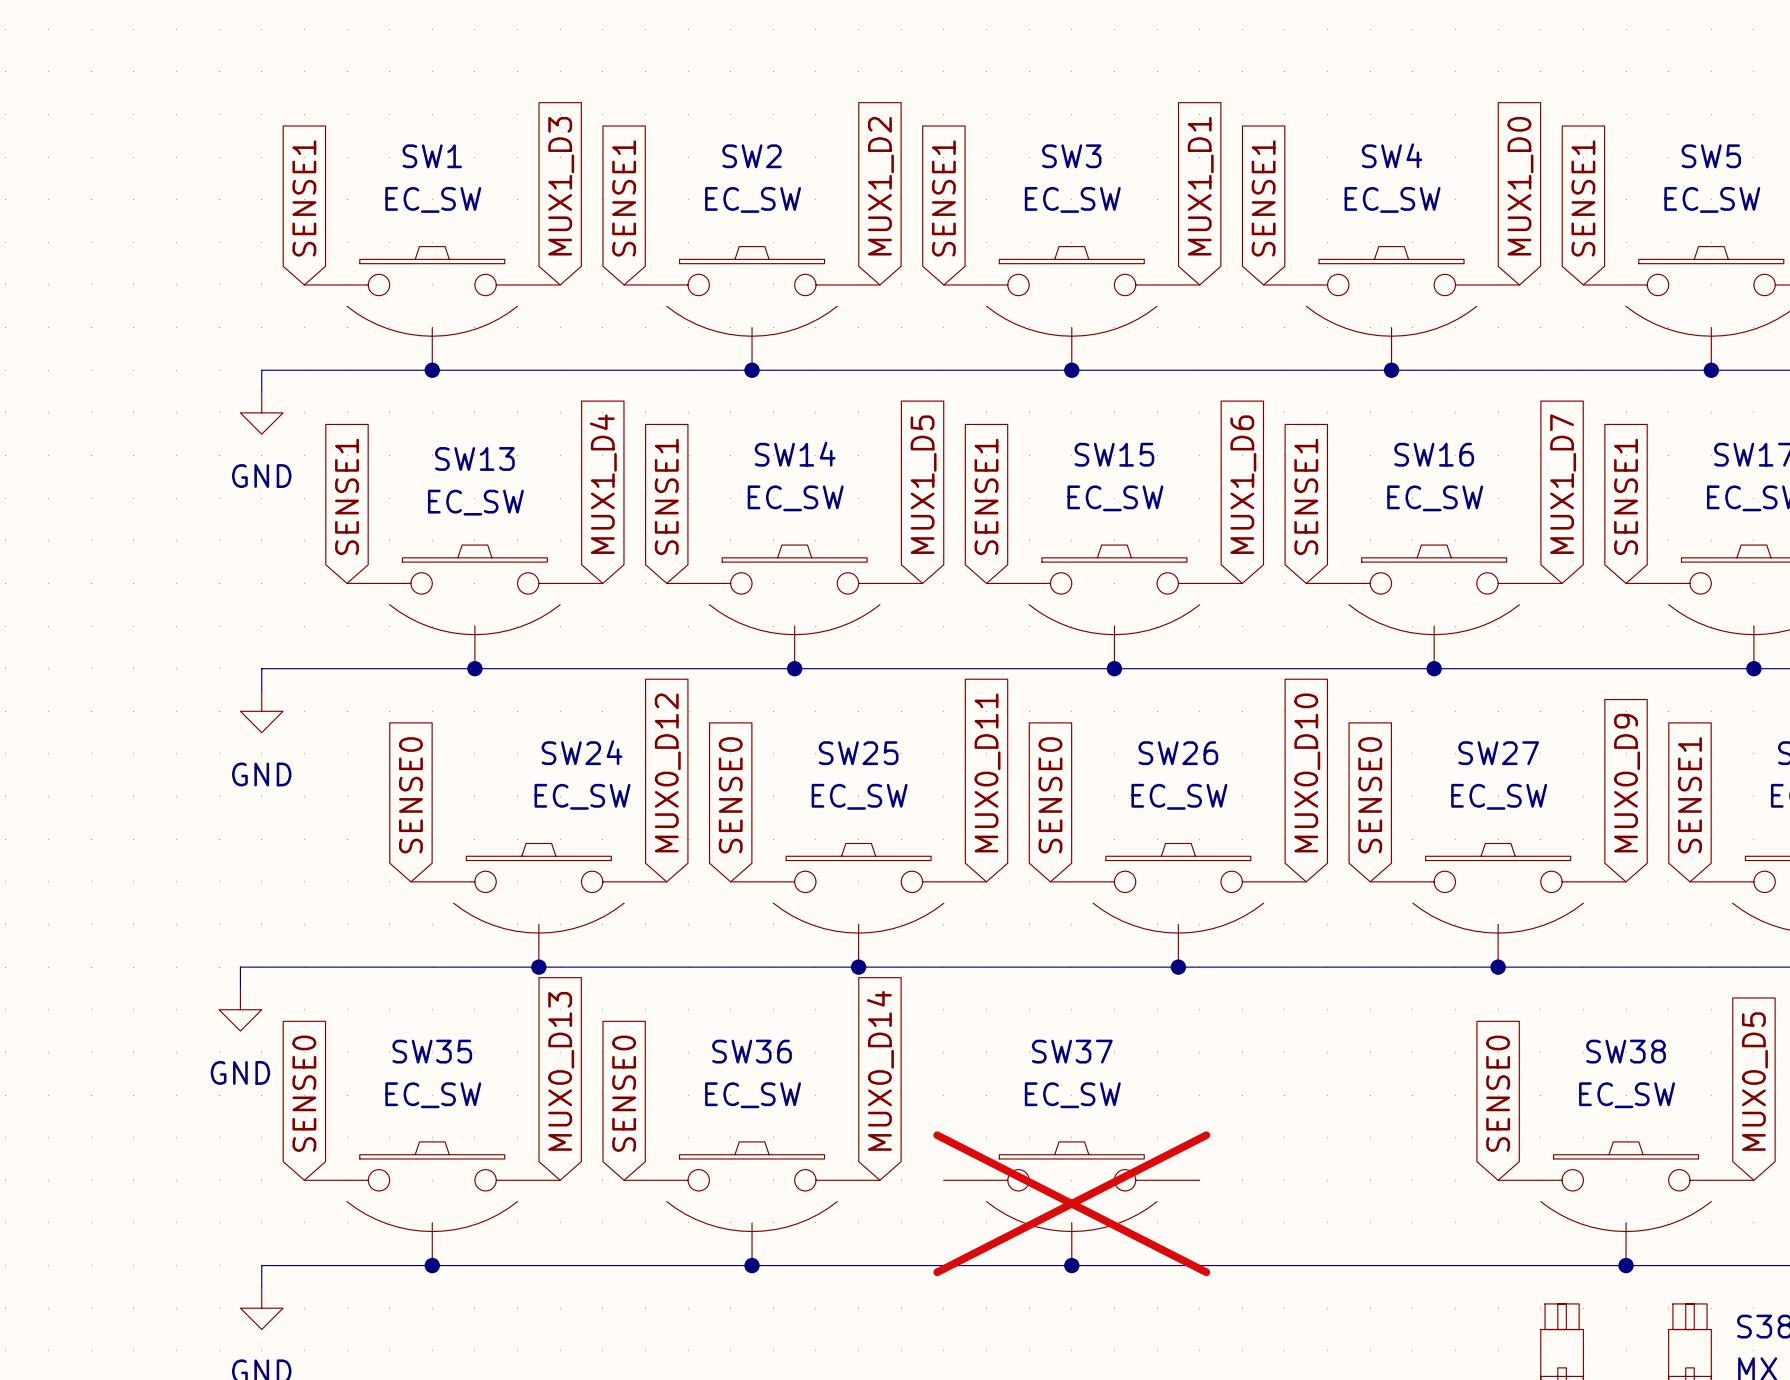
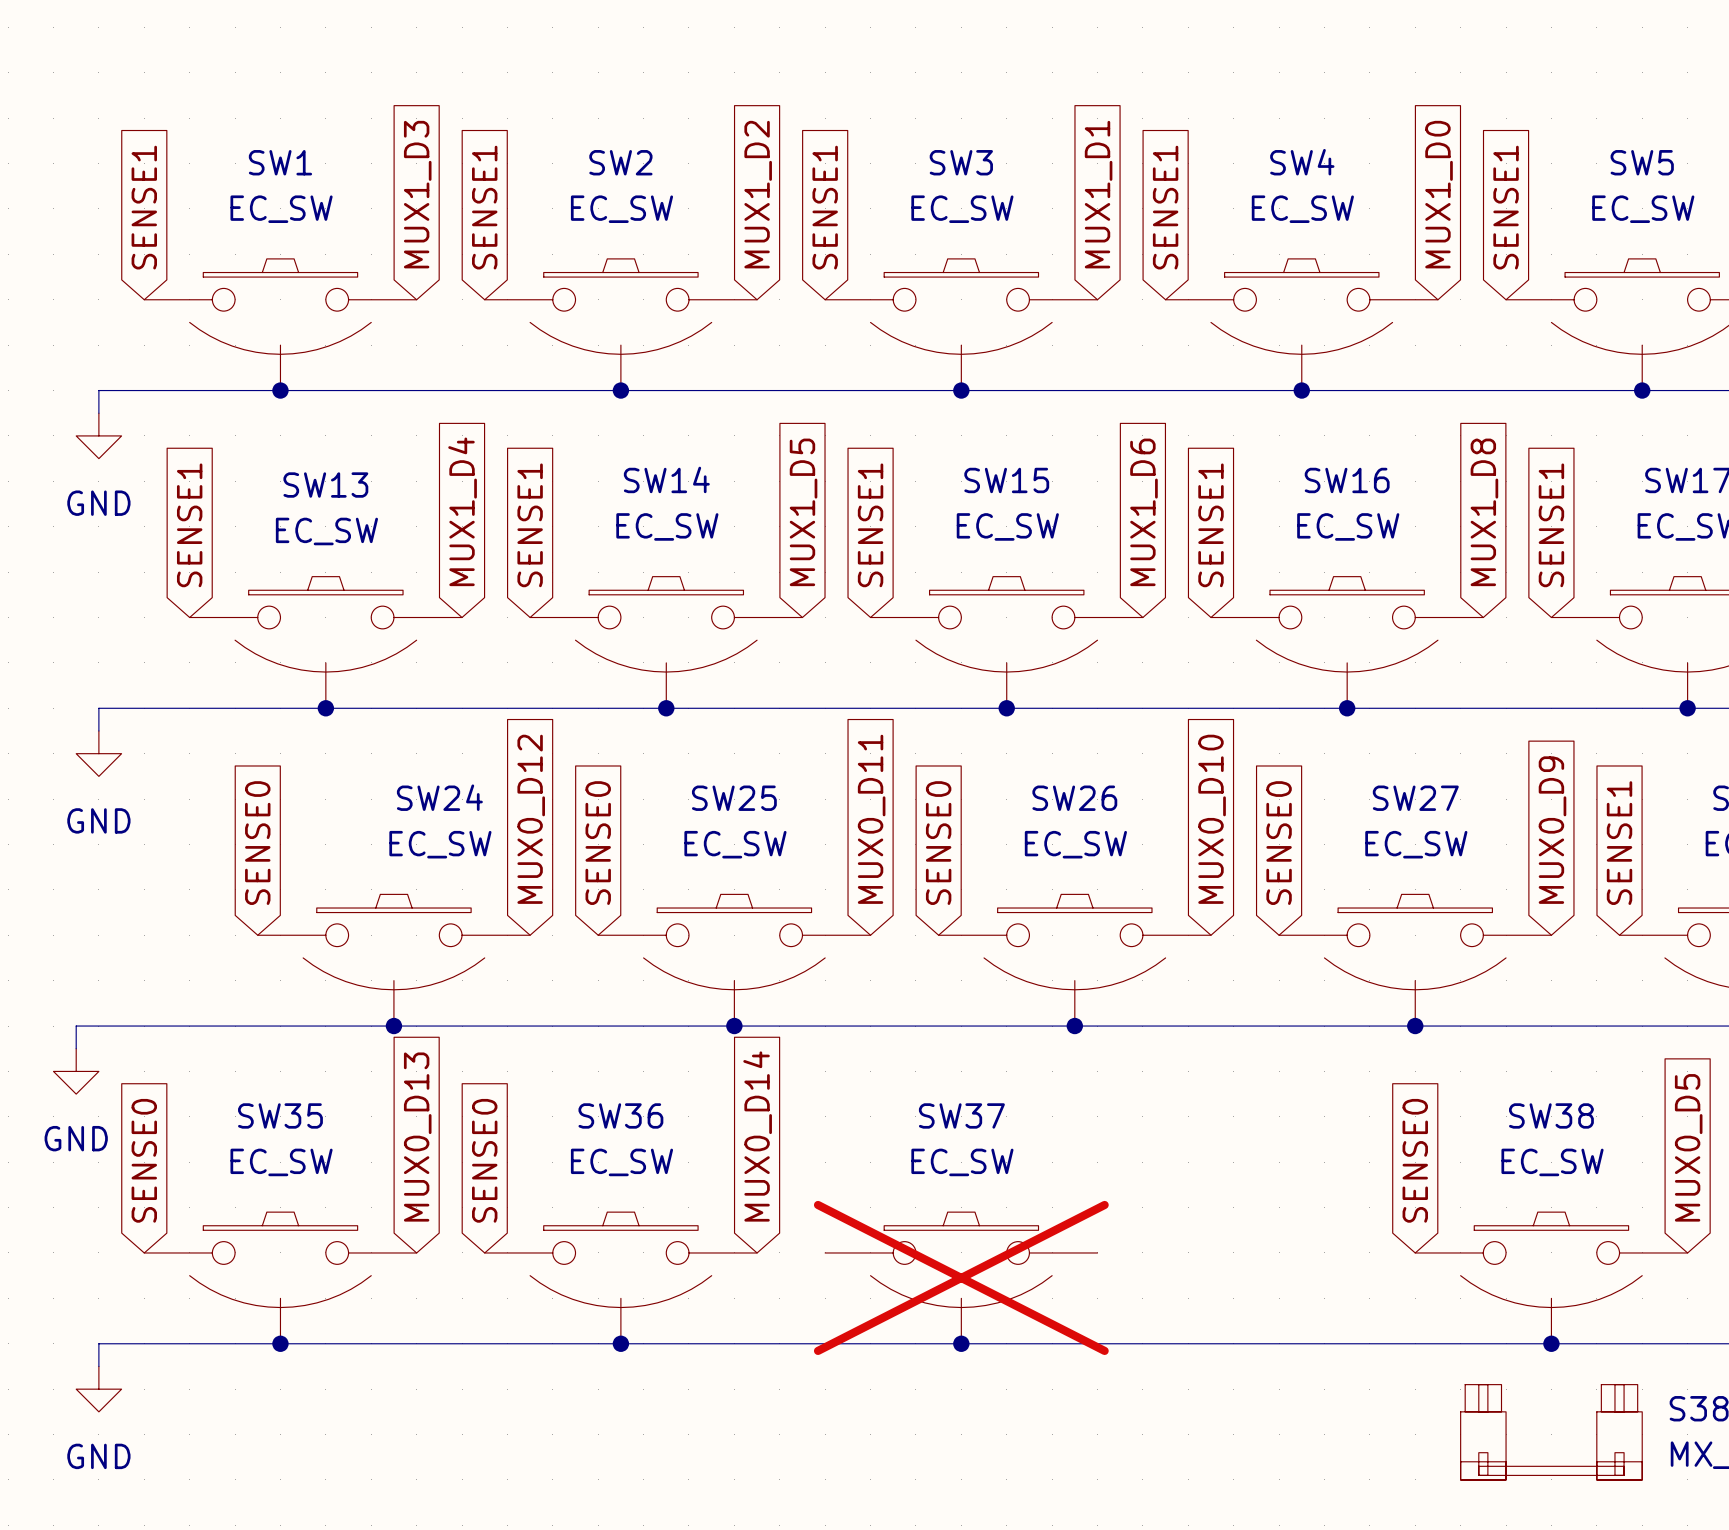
global label: MUX1_D7 (1563, 484) -> MUX1_D8 (1484, 512)

